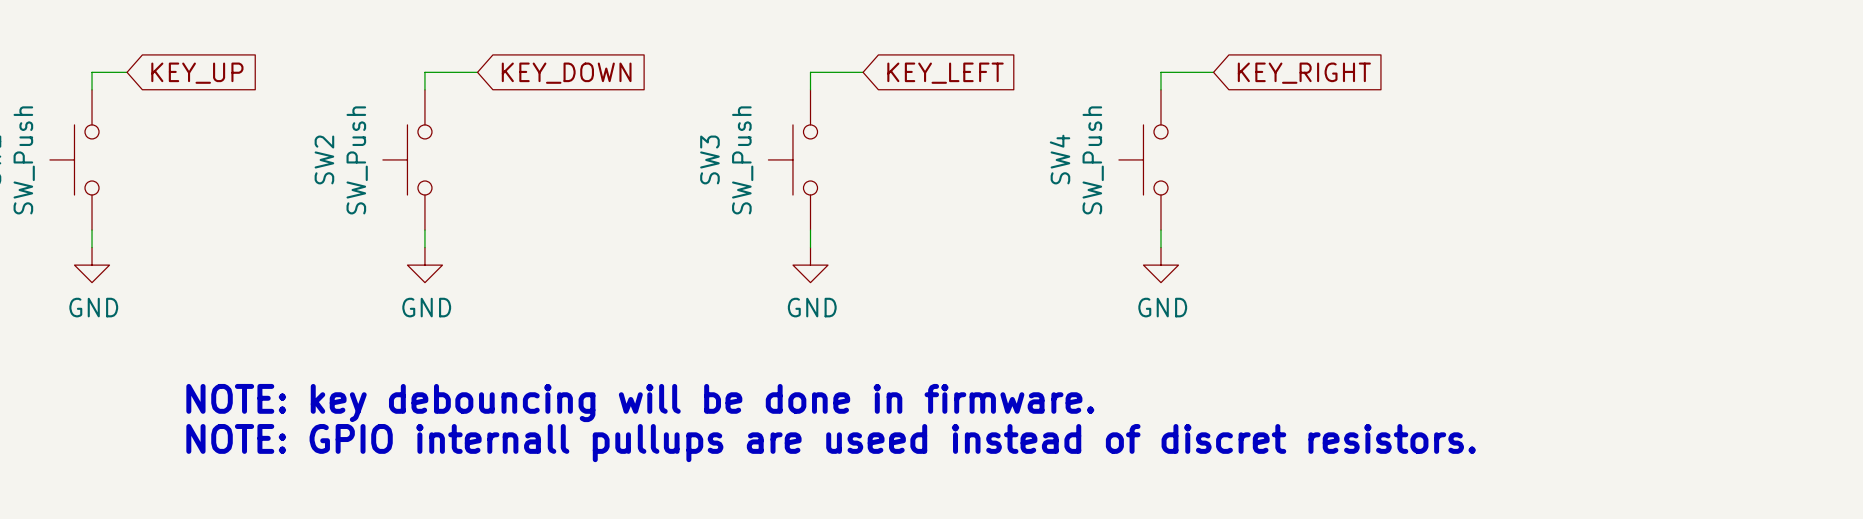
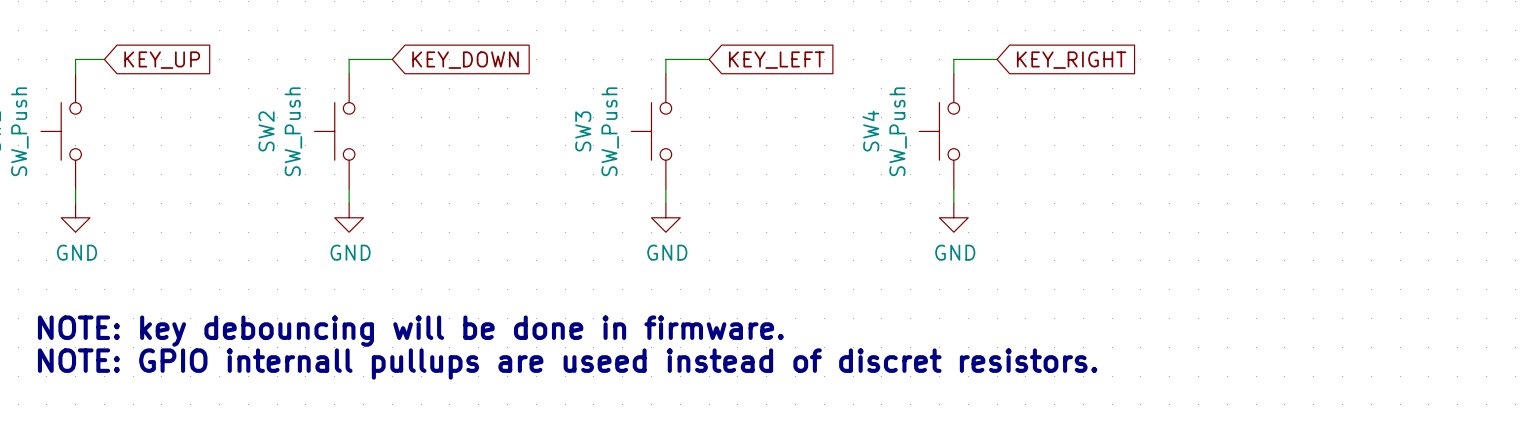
text position: NOTE: key debouncing will be done in firmware. (640, 403) -> NOTE: key debouncing will be done in firmware. (410, 331)
text position: NOTE: GPIO internall pullups are useed instead of discret resistors. (831, 443) -> NOTE: GPIO internall pullups are useed instead of discret resistors. (567, 364)

